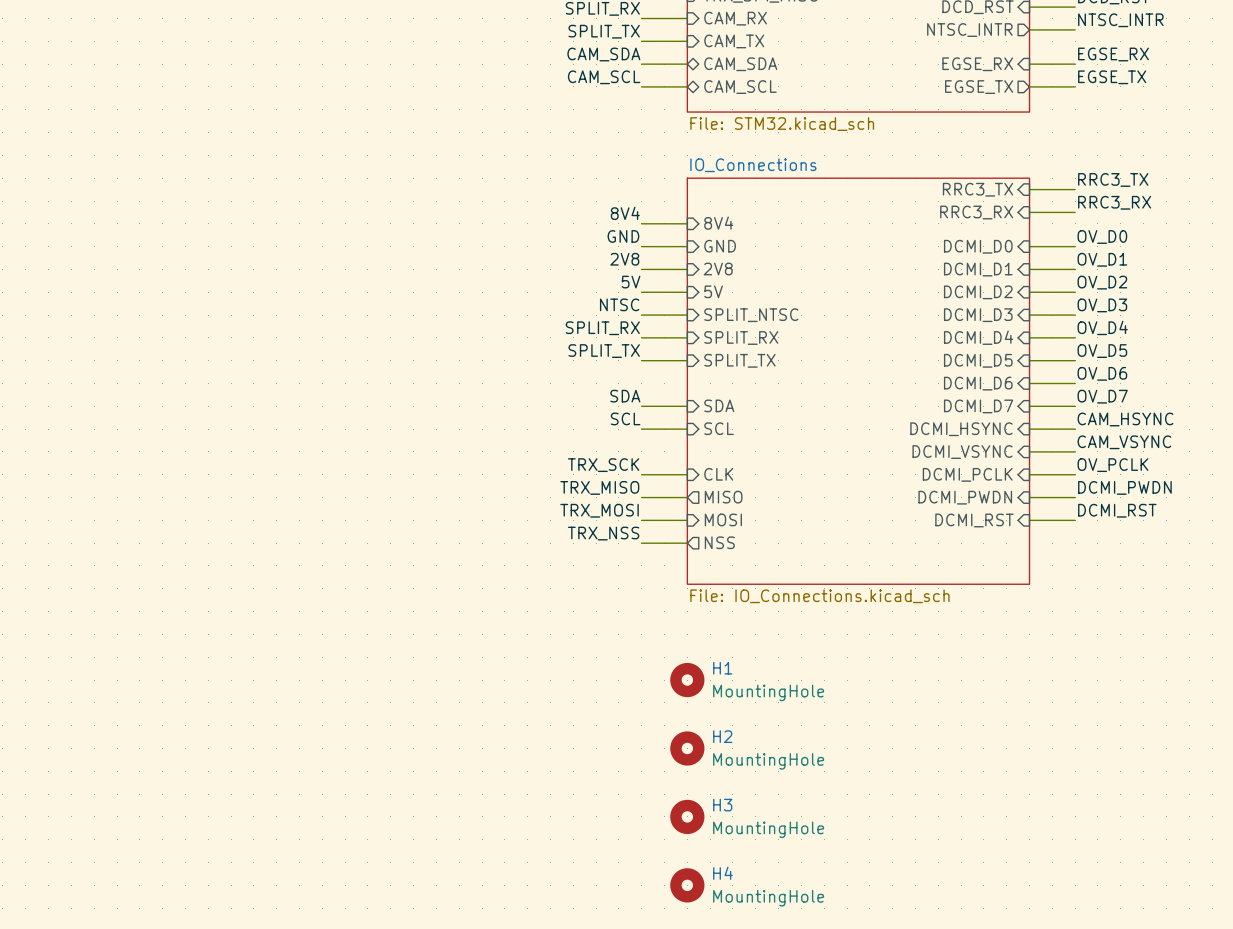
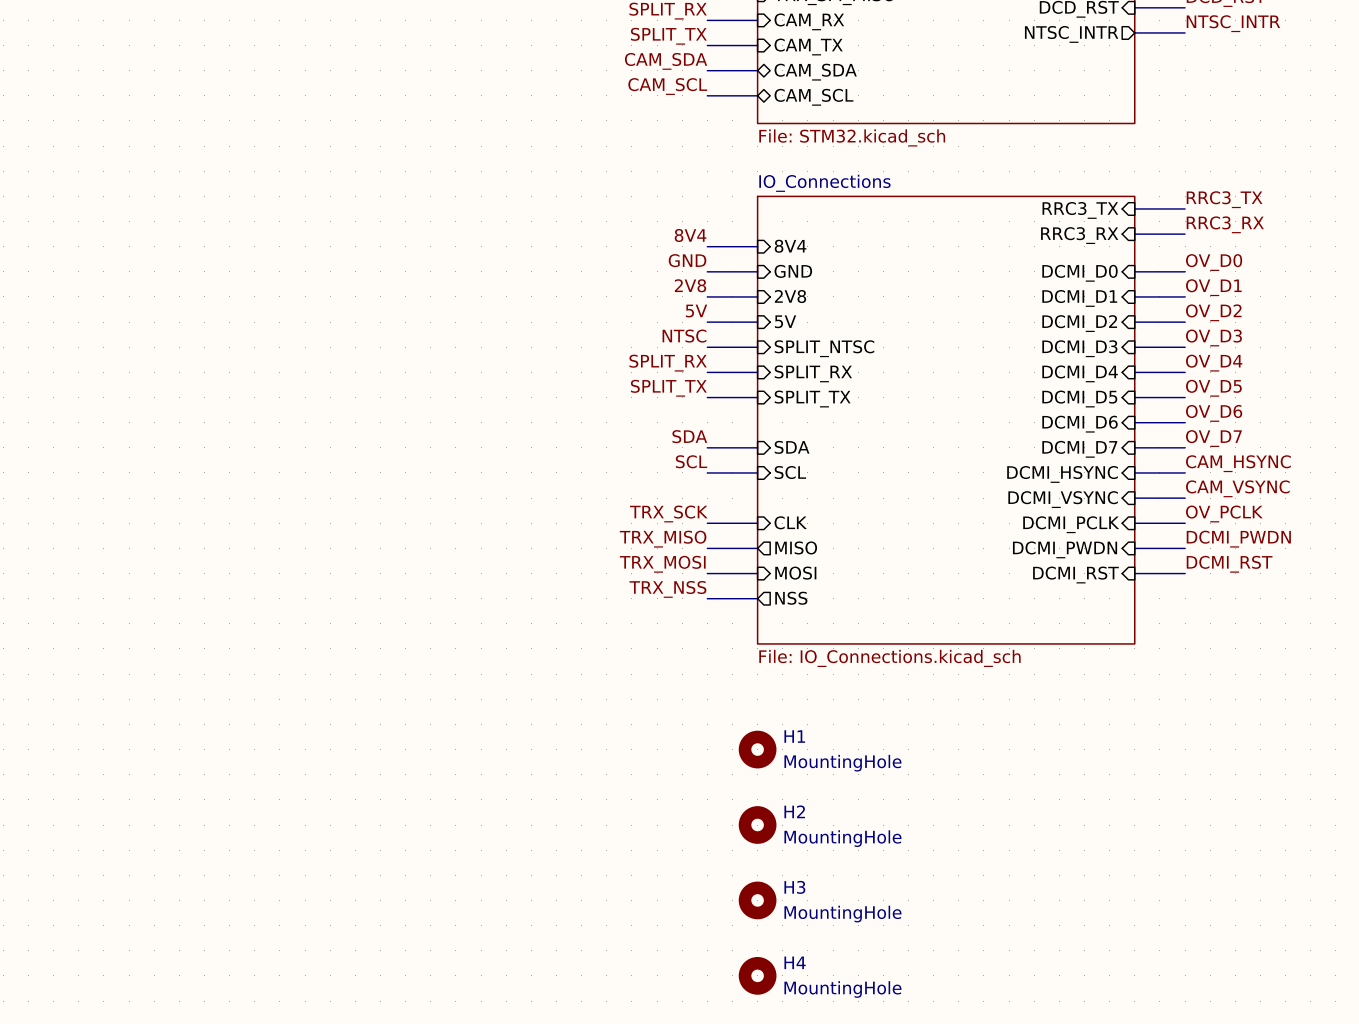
label: EGSE_RX (1113, 54) -> none
sheet pin: EGSE_RX (977, 64) -> none
wire: (1029, 64) (1075, 64) -> none
label: EGSE_TX (1112, 77) -> none
wire: (1029, 86) (1075, 86) -> none
sheet pin: EGSE_TX (979, 87) -> none

